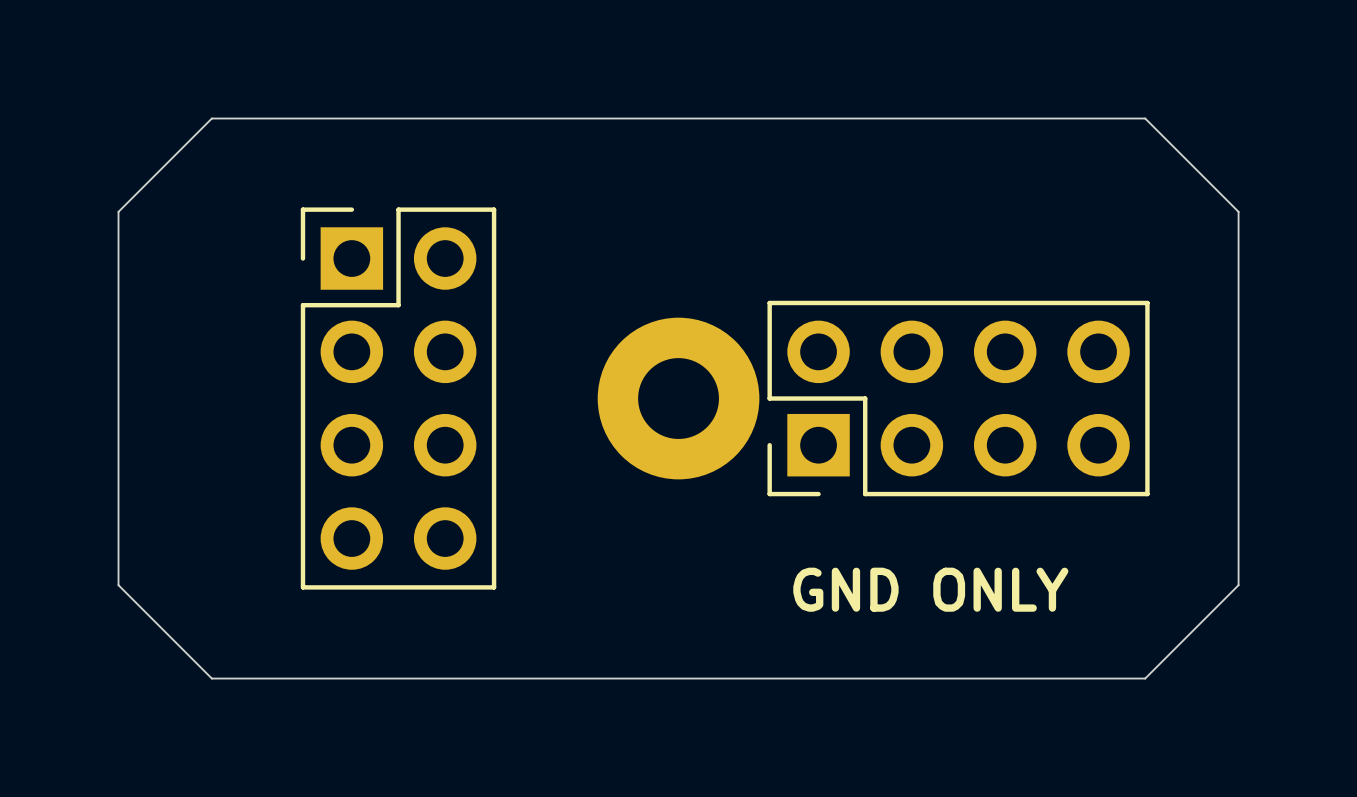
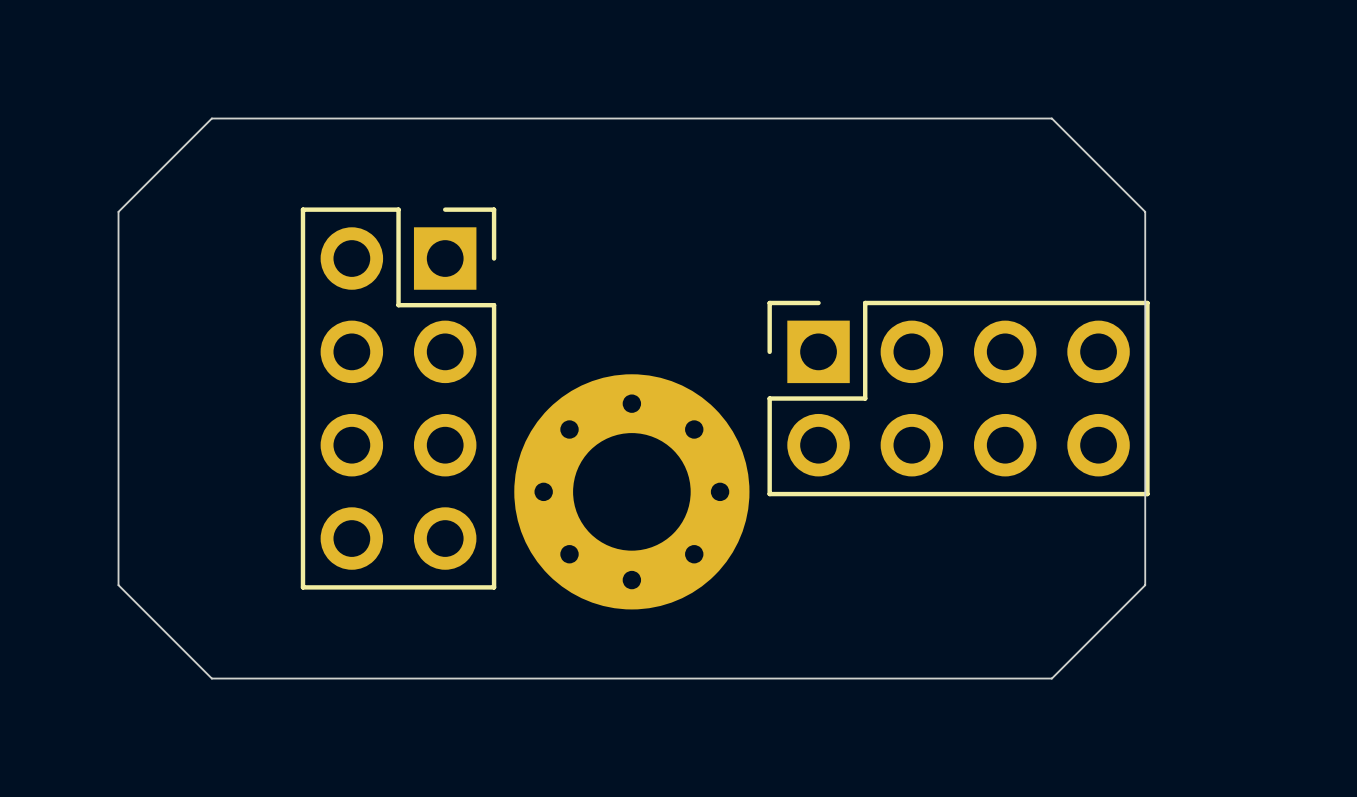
board edge: (1051, 118) (1145, 118) (1238, 211) (1238, 585) (1145, 678) (1051, 678) -> (1051, 118) (1145, 211) (1145, 585) (1051, 678)
part footprint: [300, 207, 497, 590] -> [300, 207, 497, 590]
part footprint: [767, 300, 1150, 497] -> [767, 300, 1150, 497]
part: (678, 398) -> none
part: none -> (631, 491)
text: GND ONLY (930, 589) -> none

